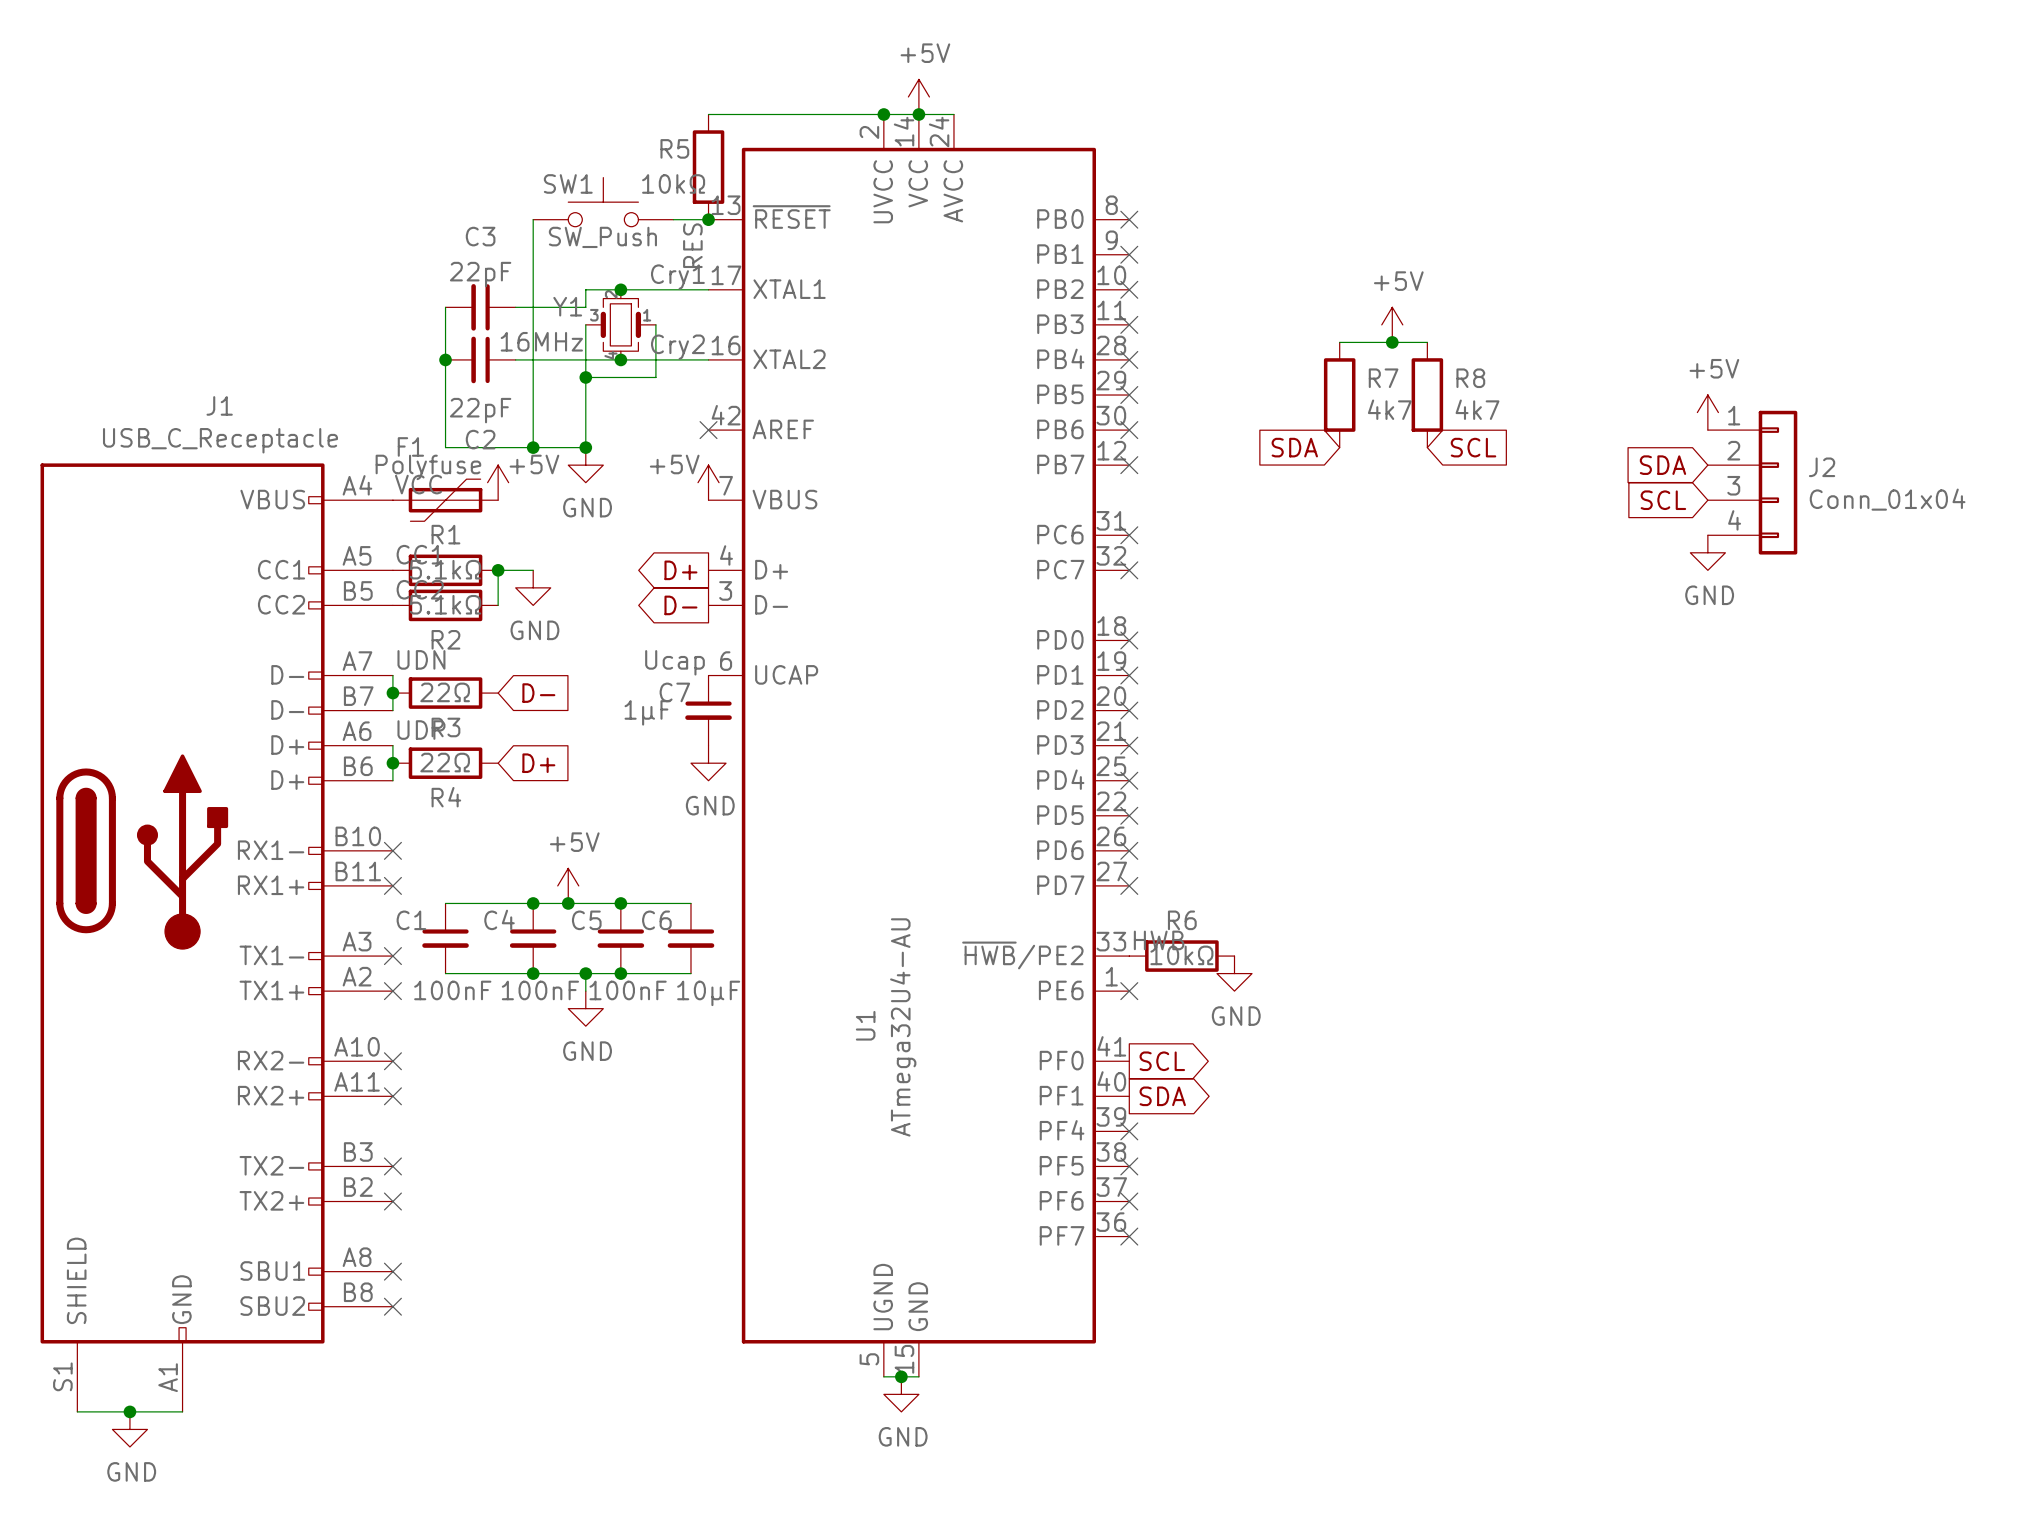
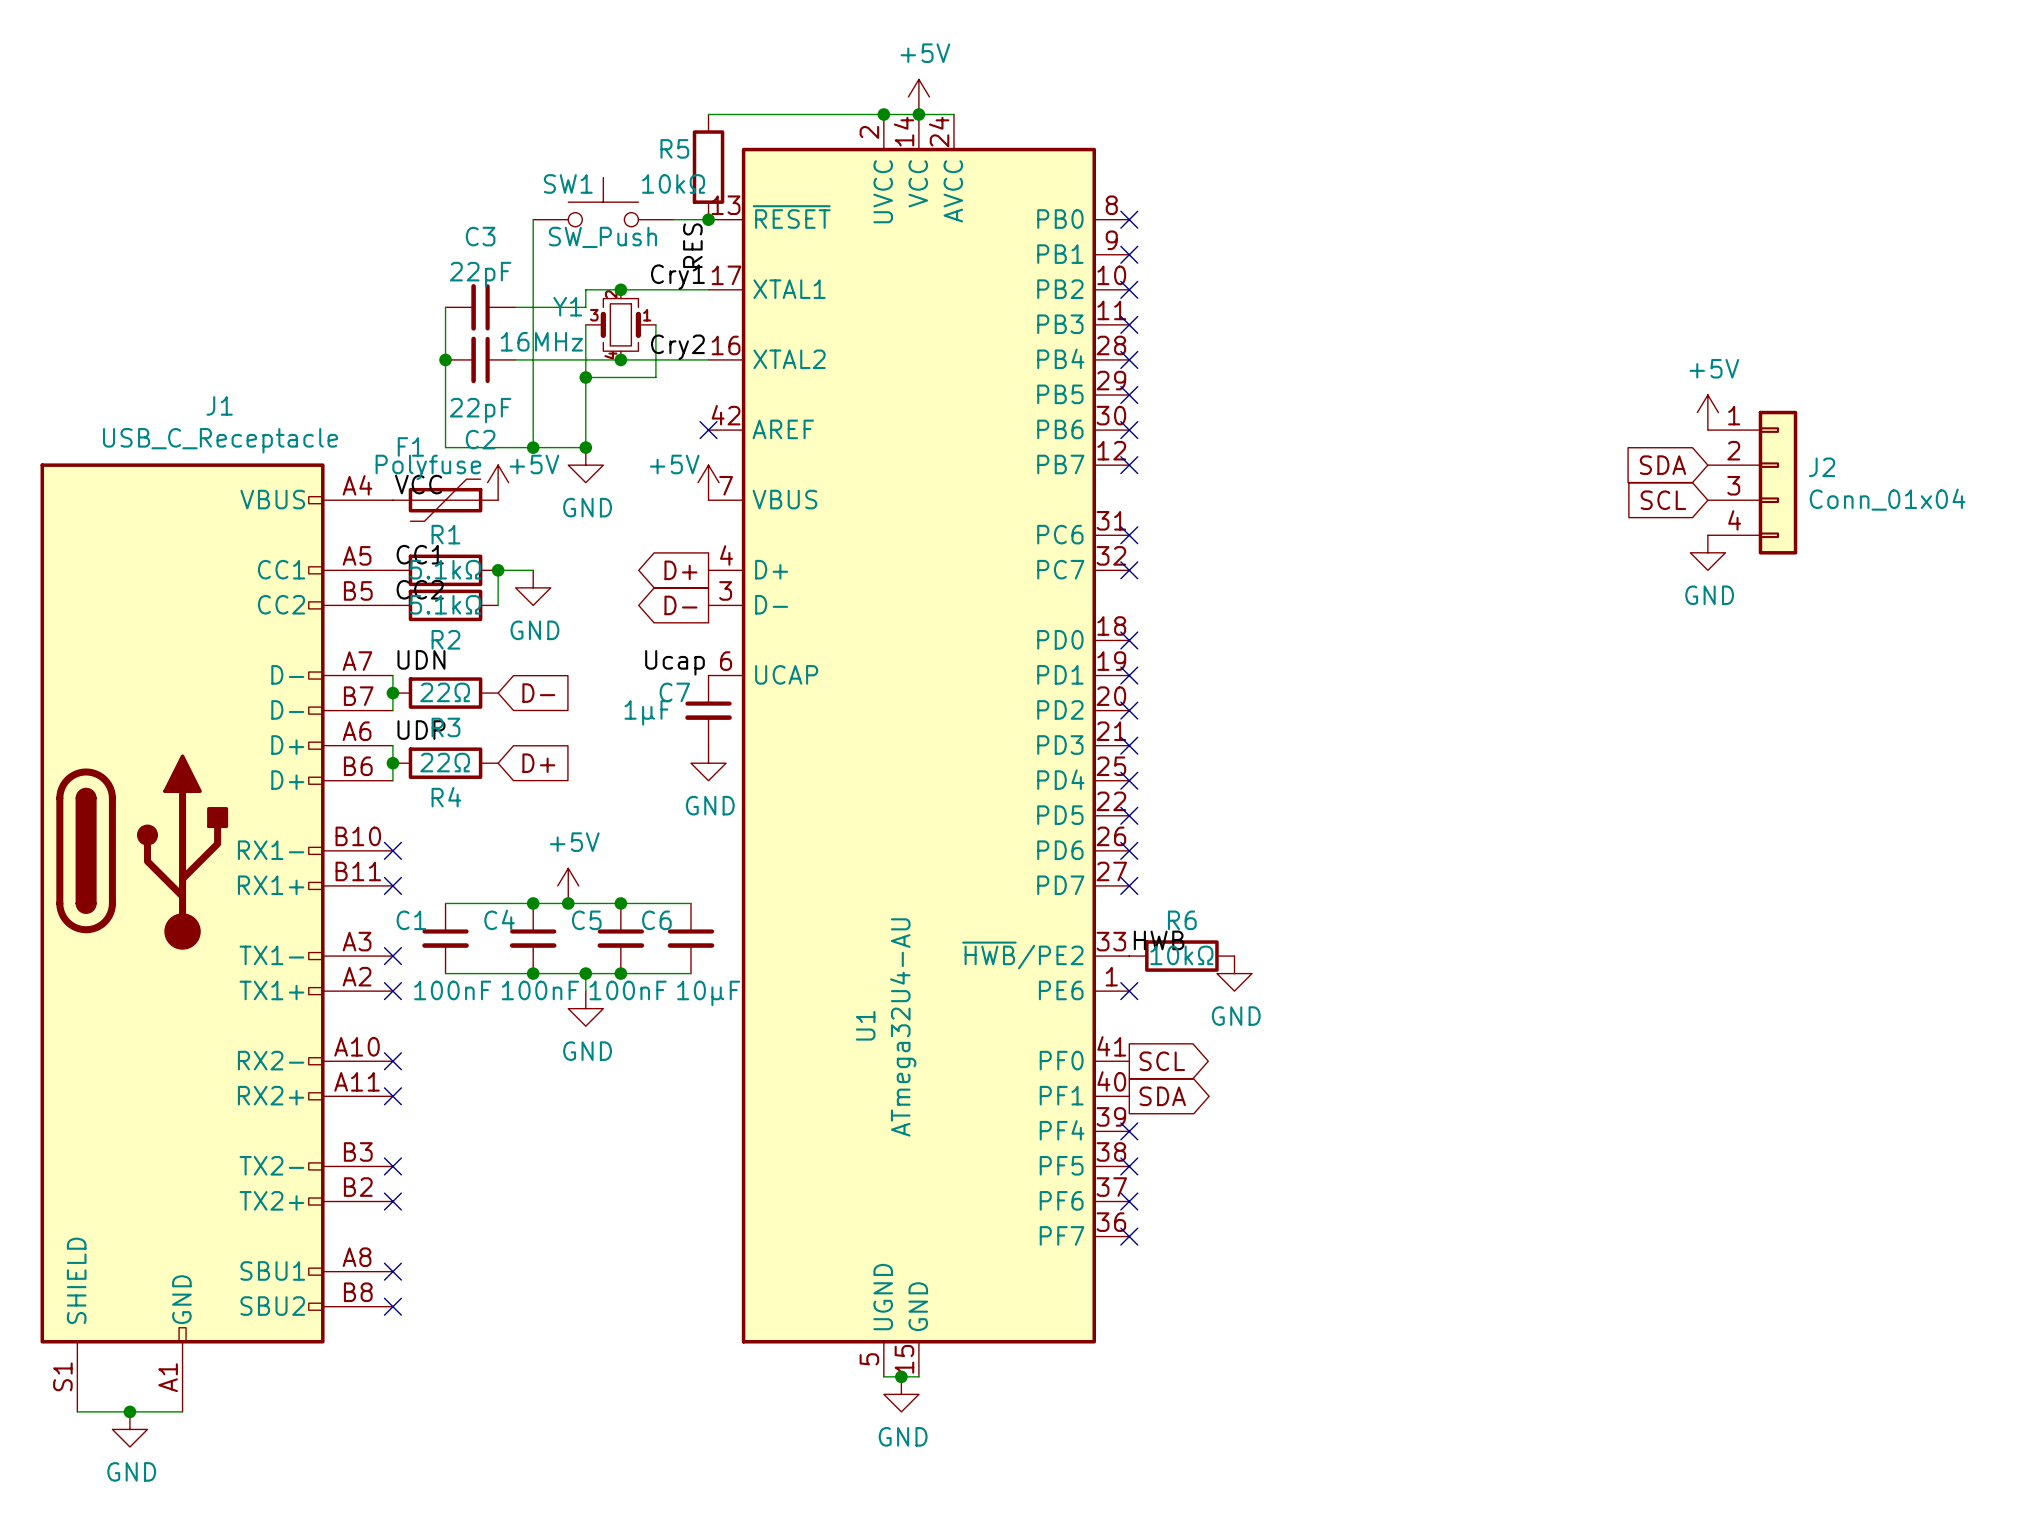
power symbol: +5V (1392, 324) -> none
wire: (1339, 342) (1427, 342) -> none
junction: (1392, 342) -> none
R7: 4k7 (1339, 395) -> none
R8: 4k7 (1427, 395) -> none
global label: SDA (1294, 447) -> none
global label: SCL (1473, 447) -> none

